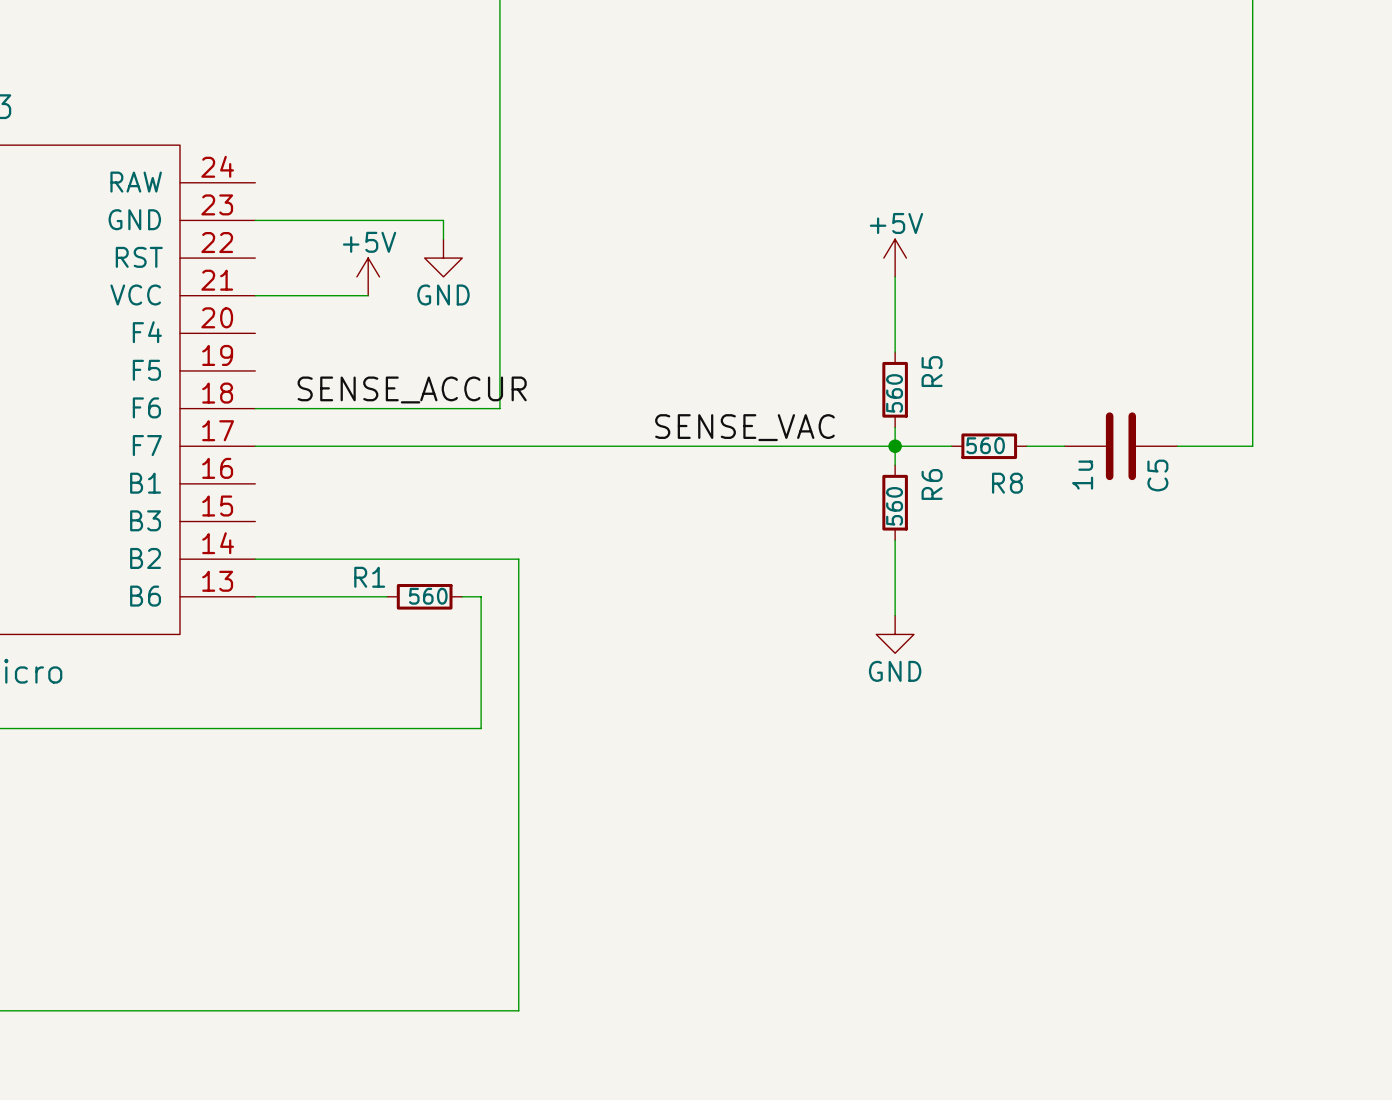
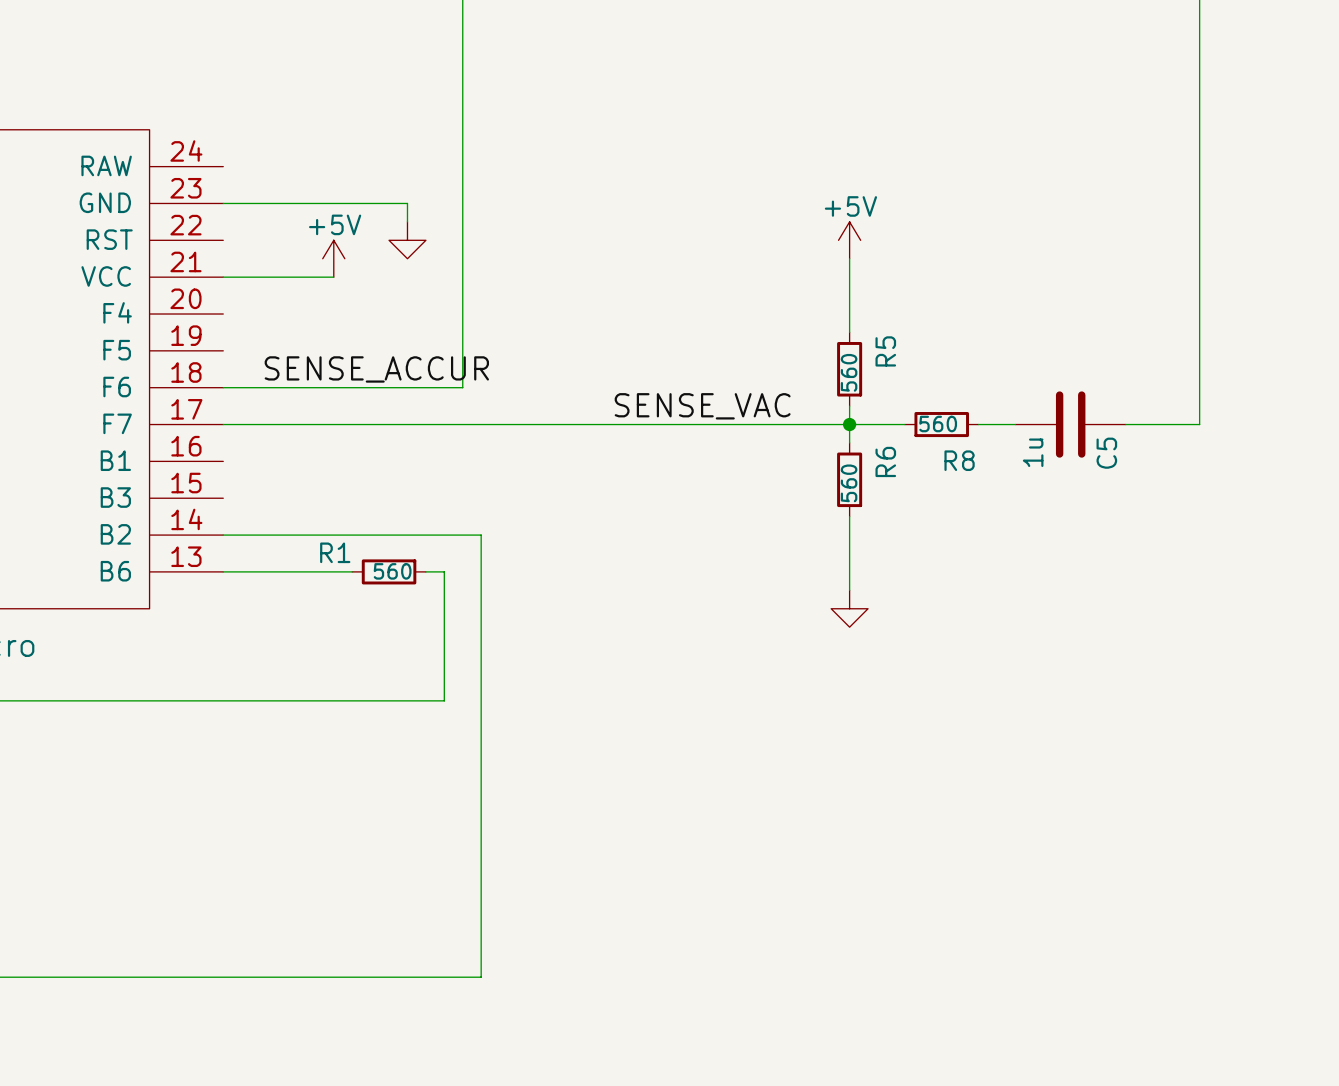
power symbol text: GND (443, 294) -> none
power symbol text: GND (895, 671) -> none

